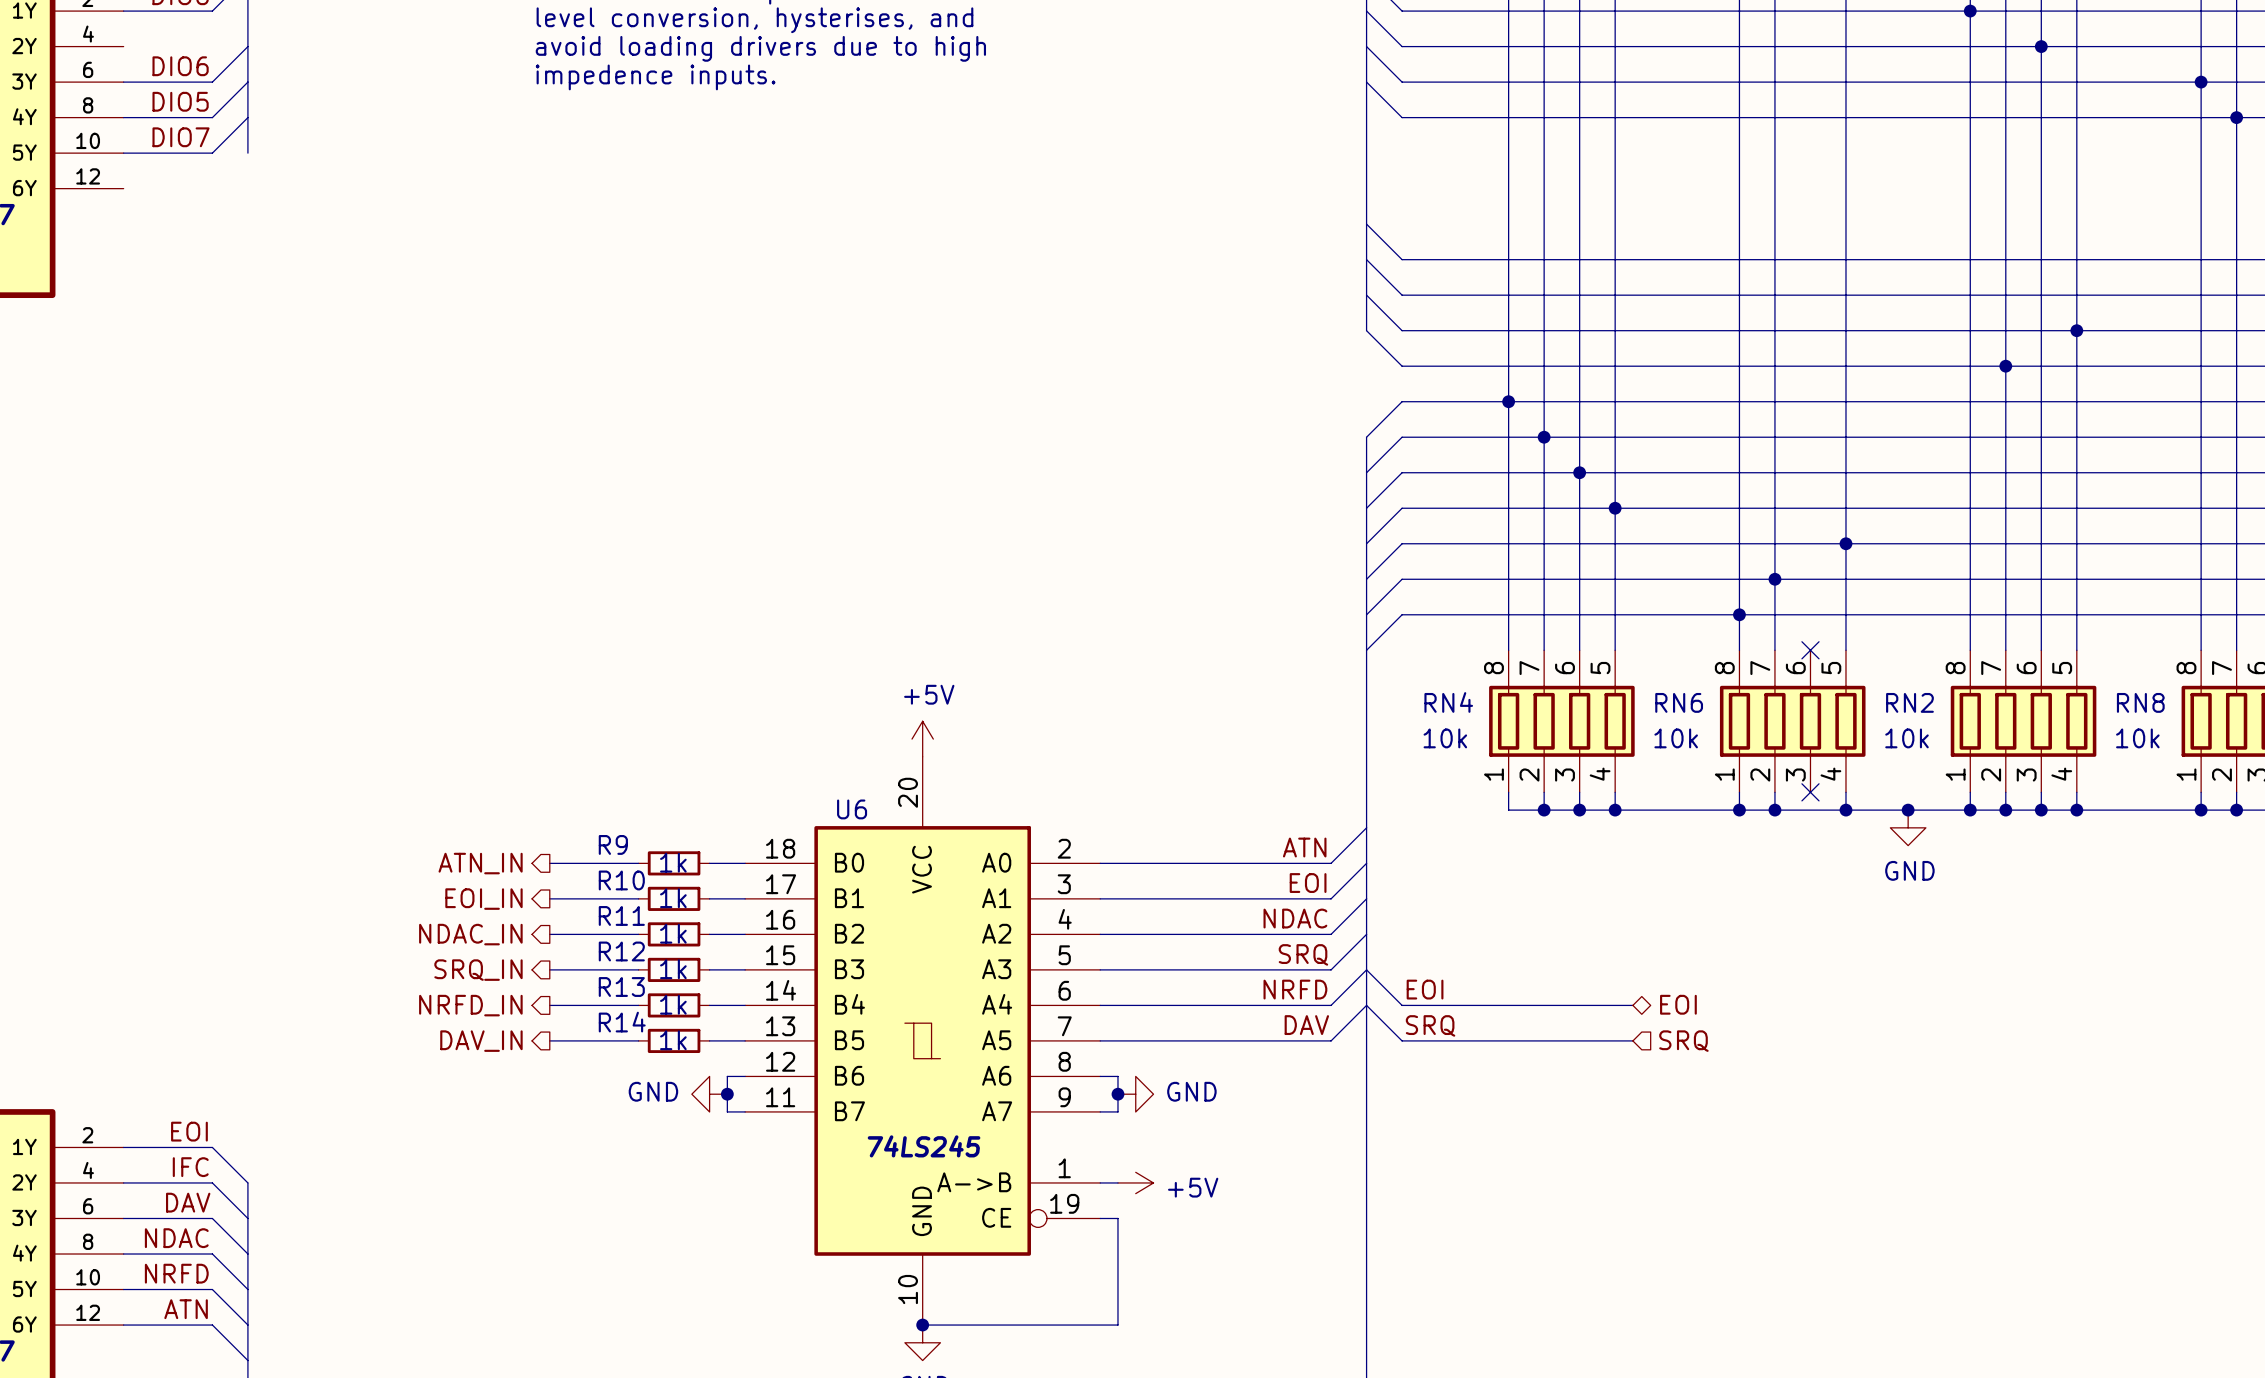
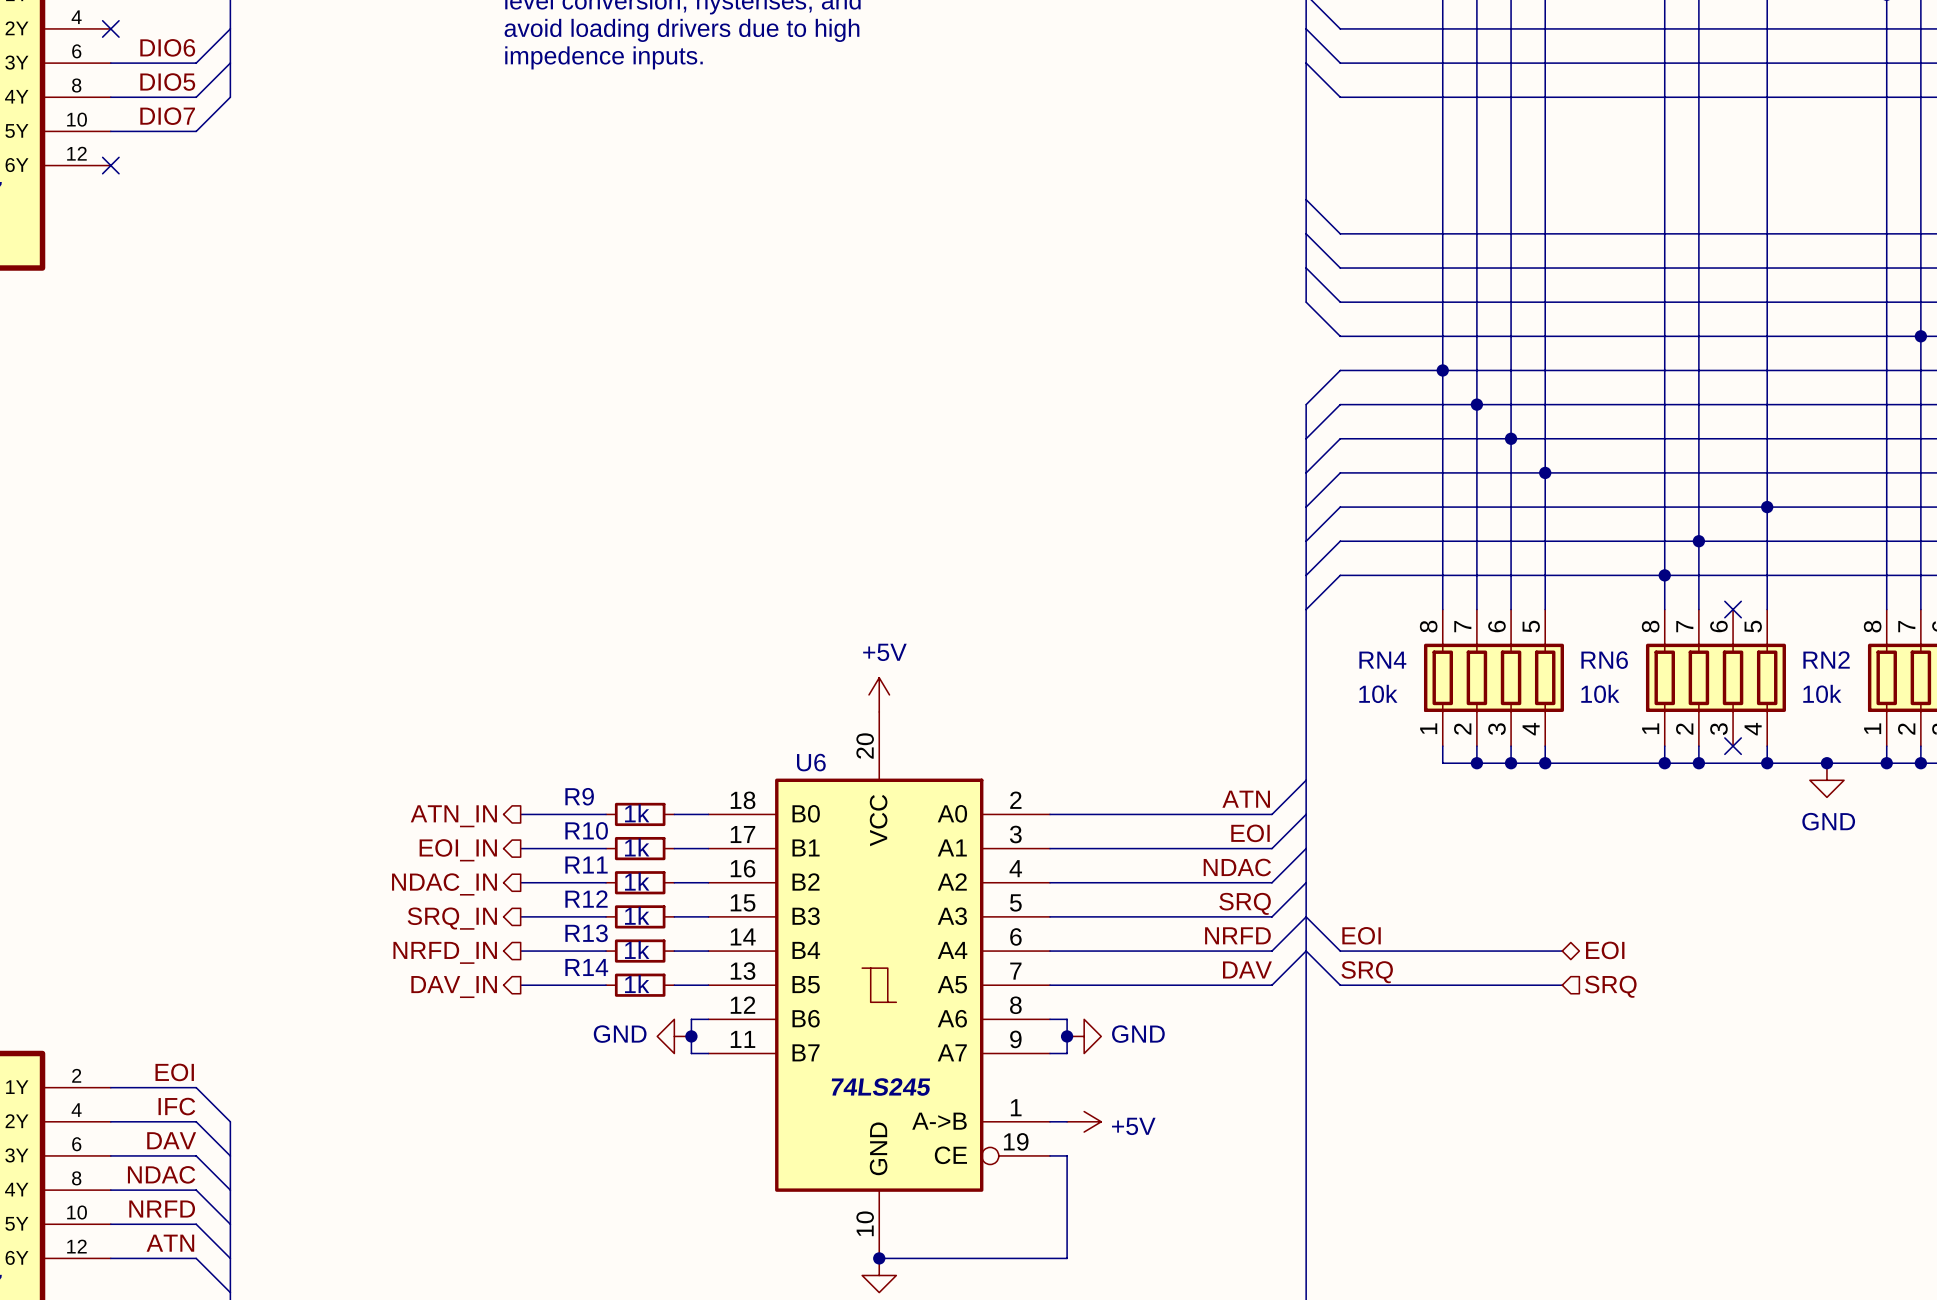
no-connect mark: none -> (110, 28)
bus: (247, 117) (247, 153) -> none
no-connect mark: none -> (110, 165)

